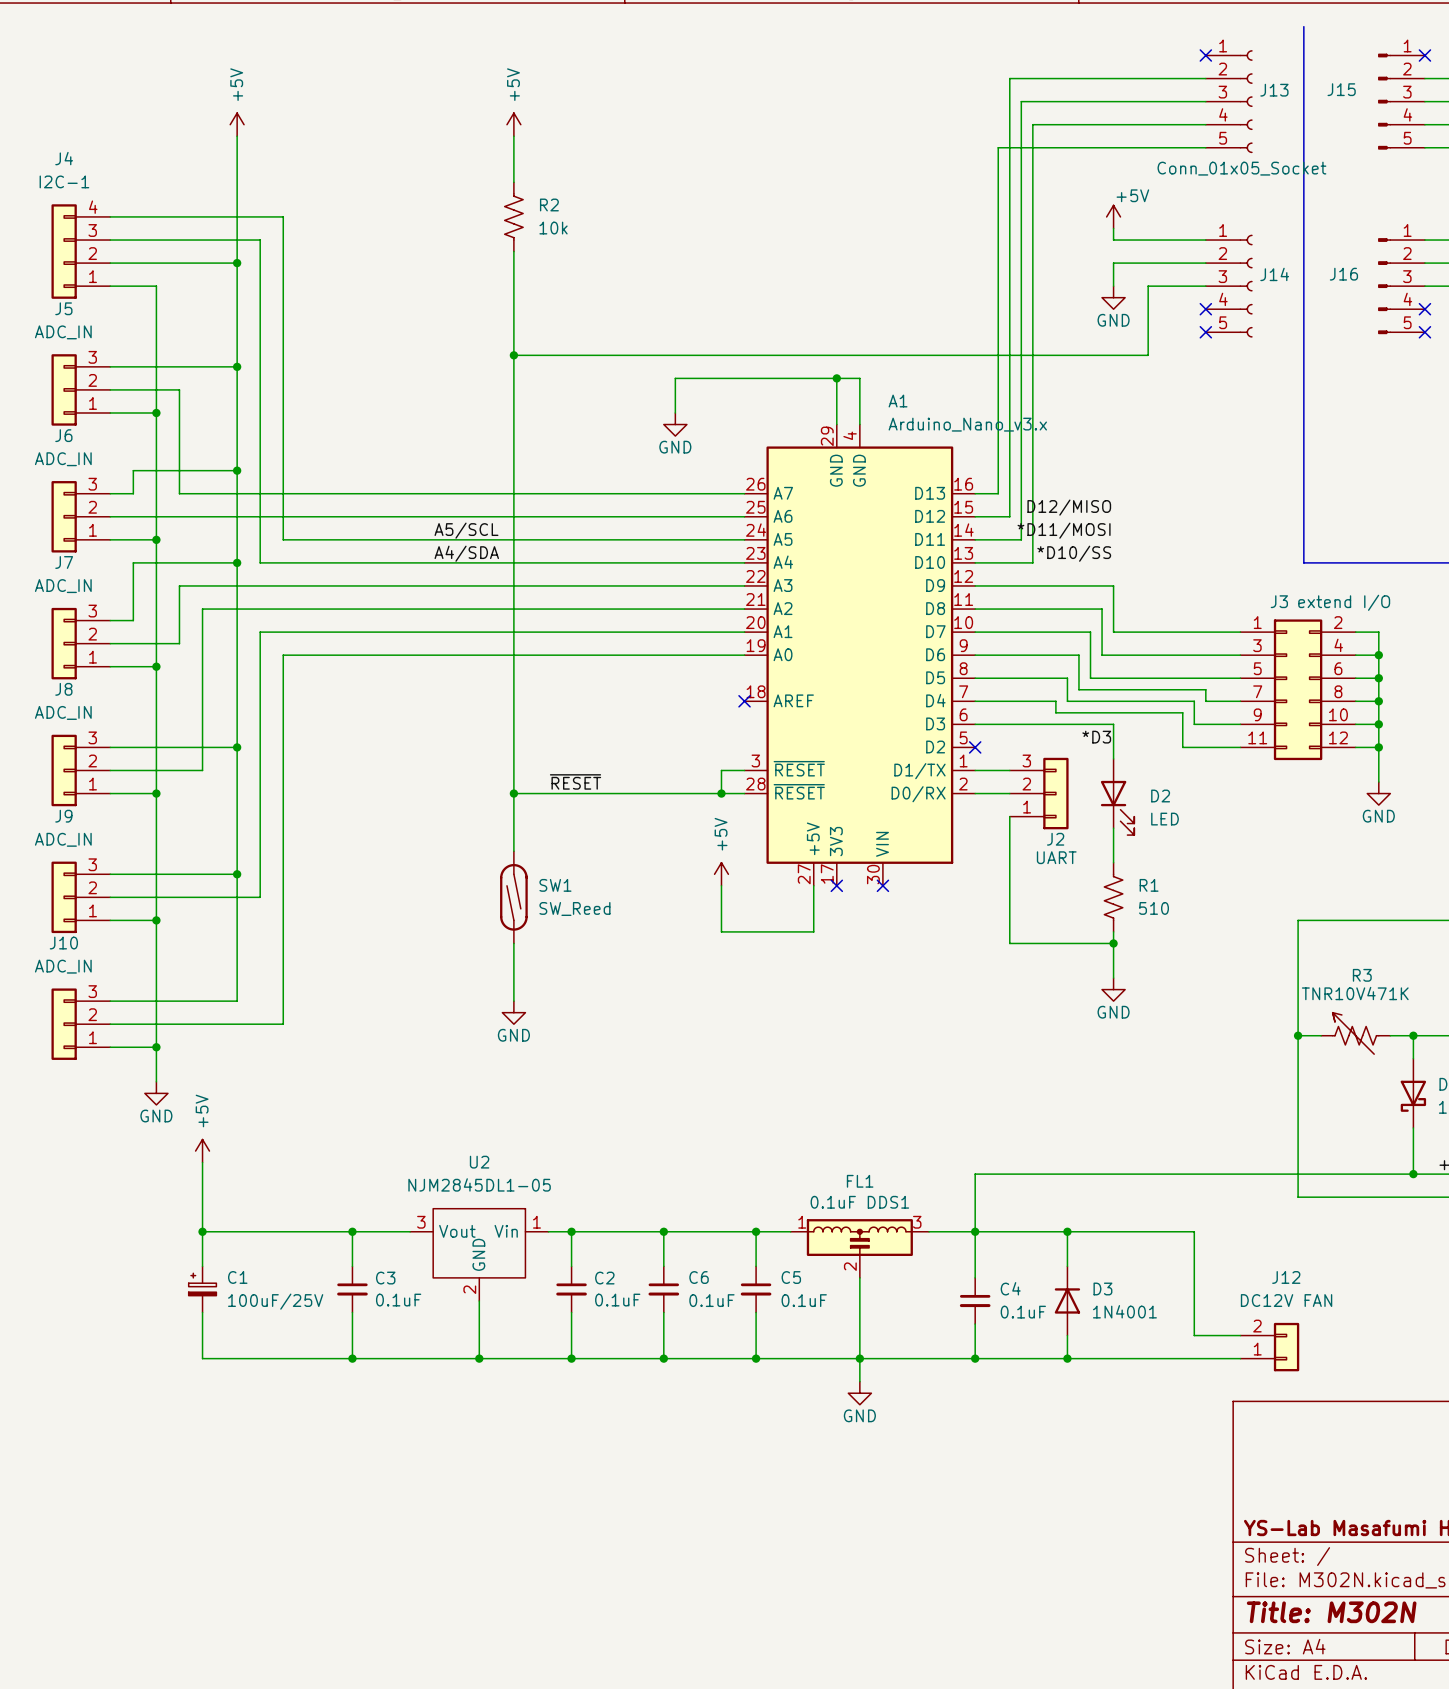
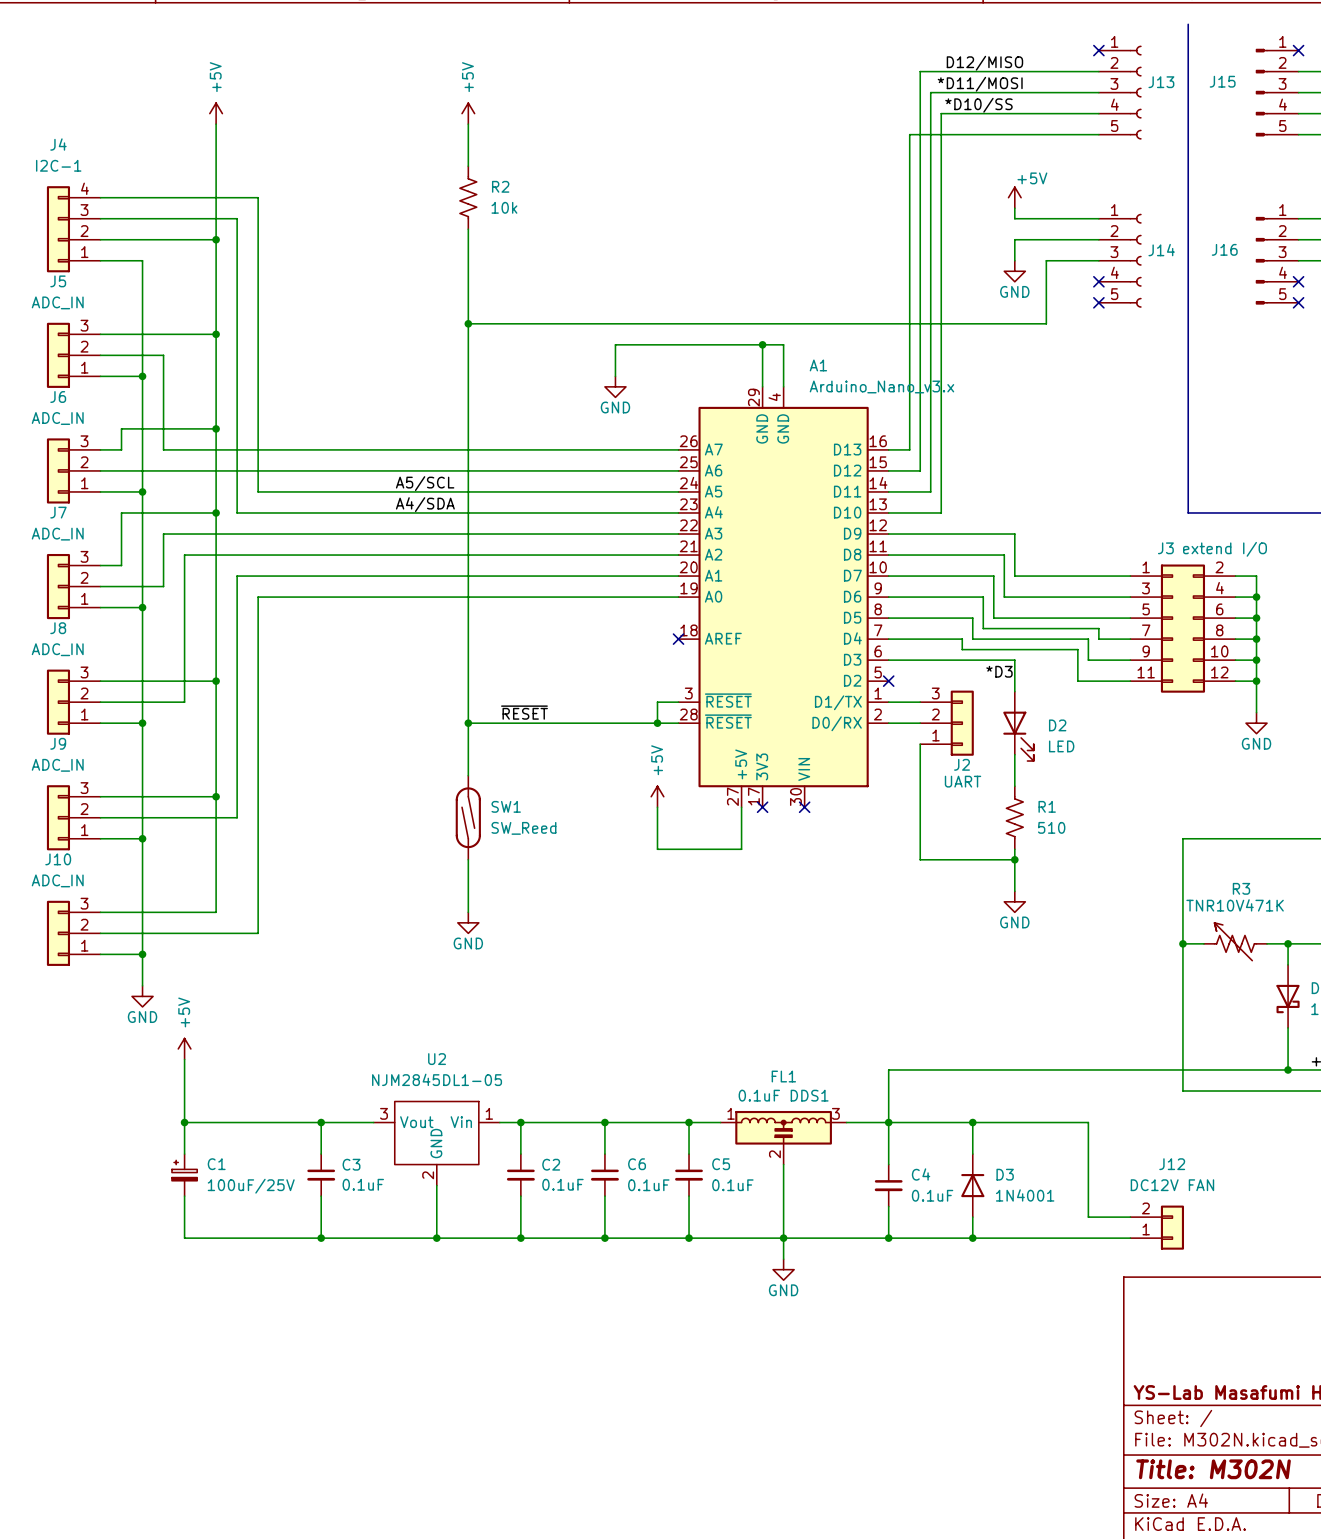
label: none -> D12/MISO (984, 63)
label: none -> *D11/MOSI (980, 84)
label: none -> *D10/SS (978, 105)
J13 value: Conn_01x05_Socket (1241, 168) -> none
label: D12/MISO (1069, 507) -> none
label: *D11/MOSI (1064, 530) -> none
label: *D10/SS (1074, 553) -> none

